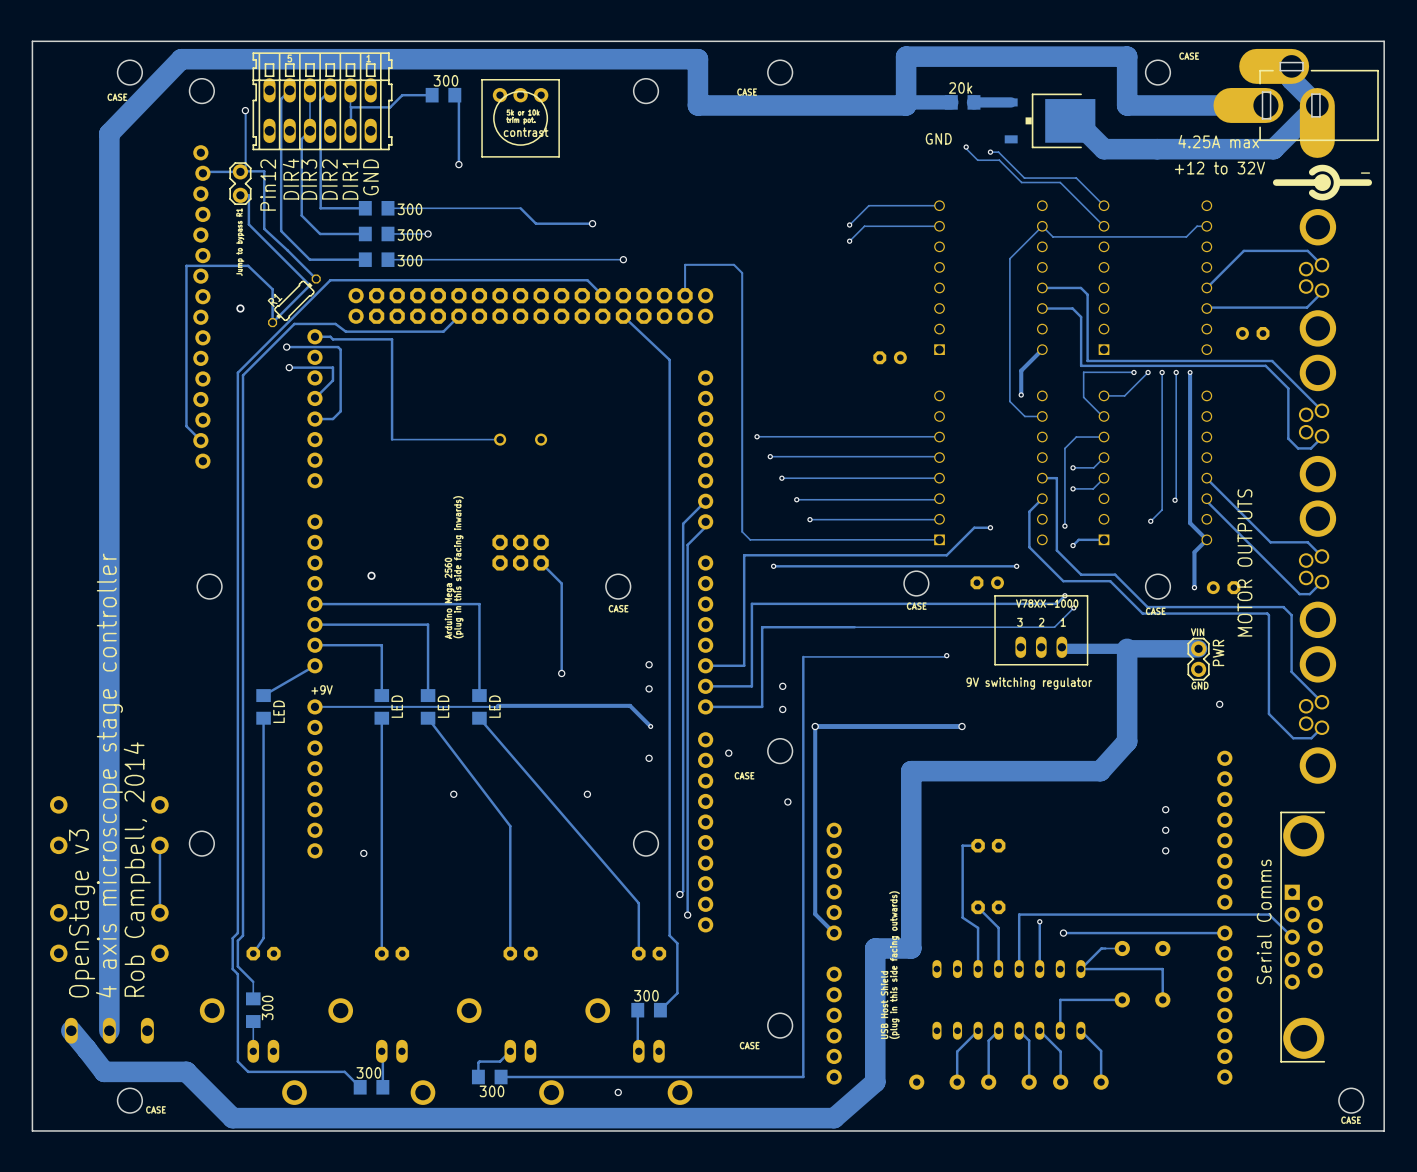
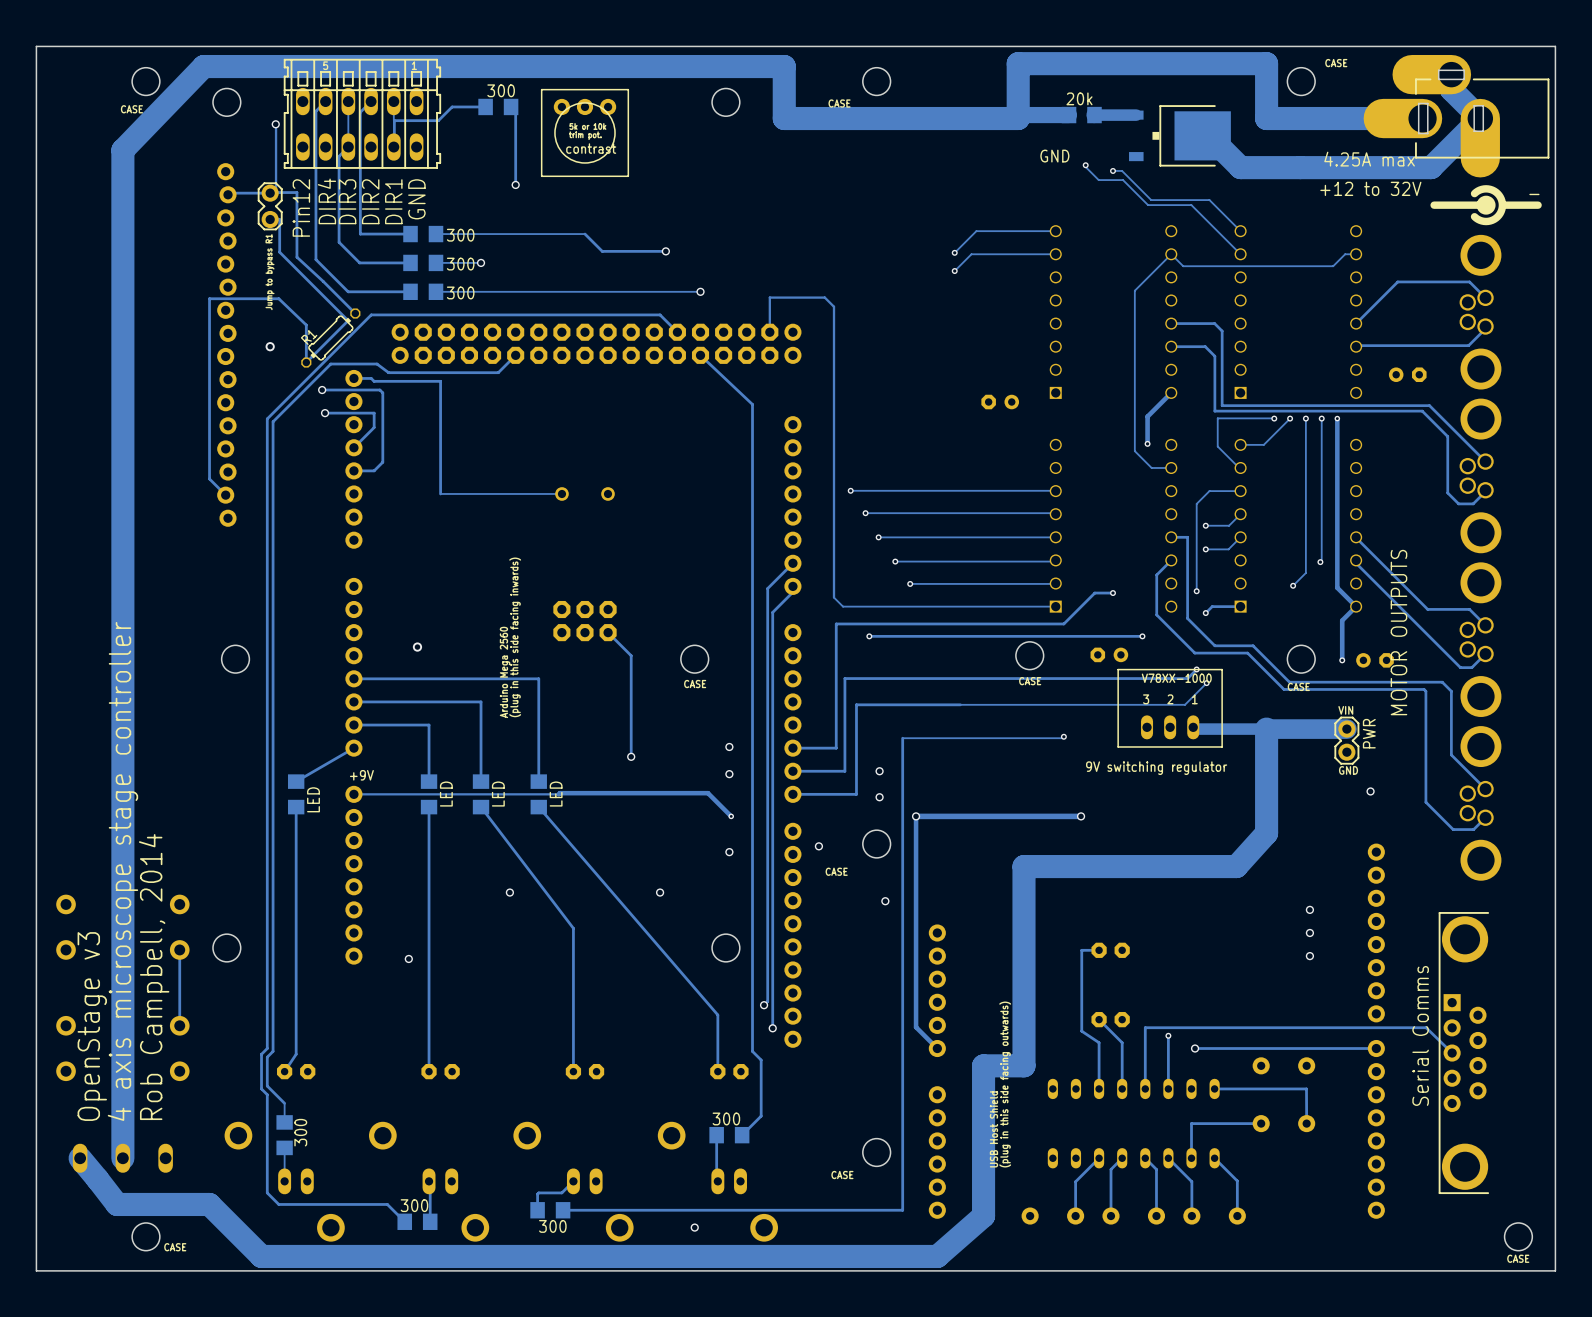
track: (1122, 948) (1101, 948) (1080, 969) -> none

